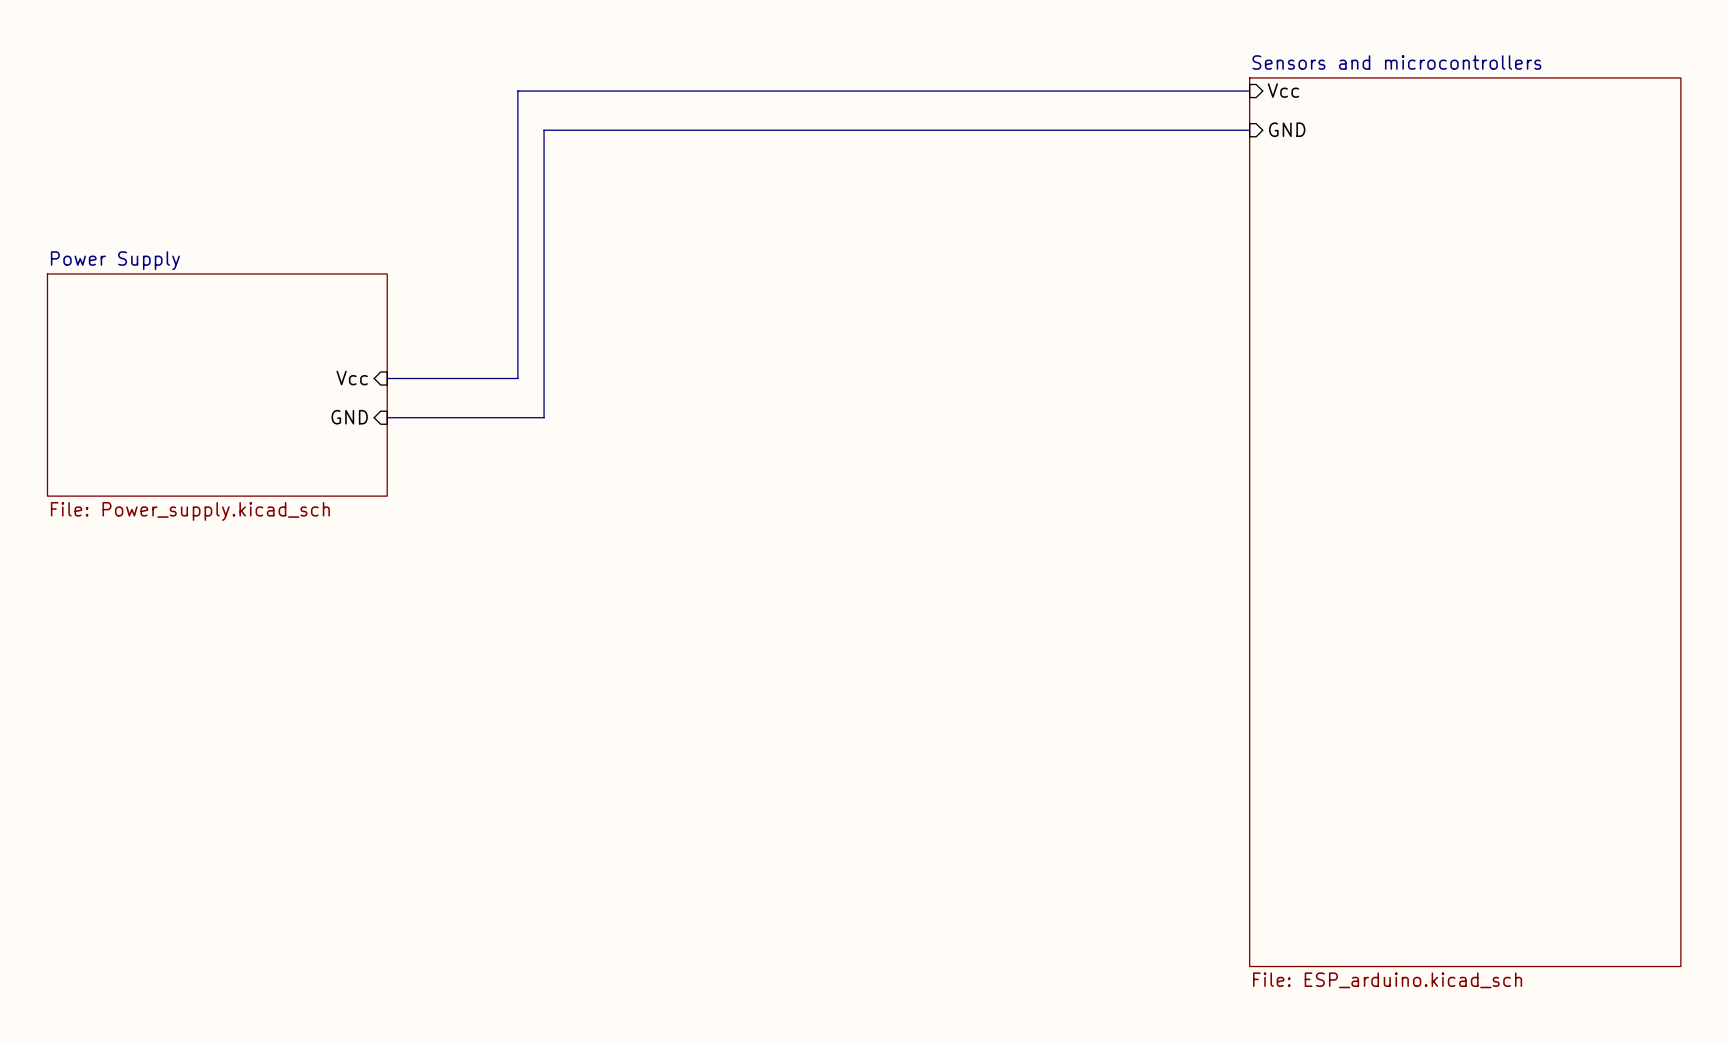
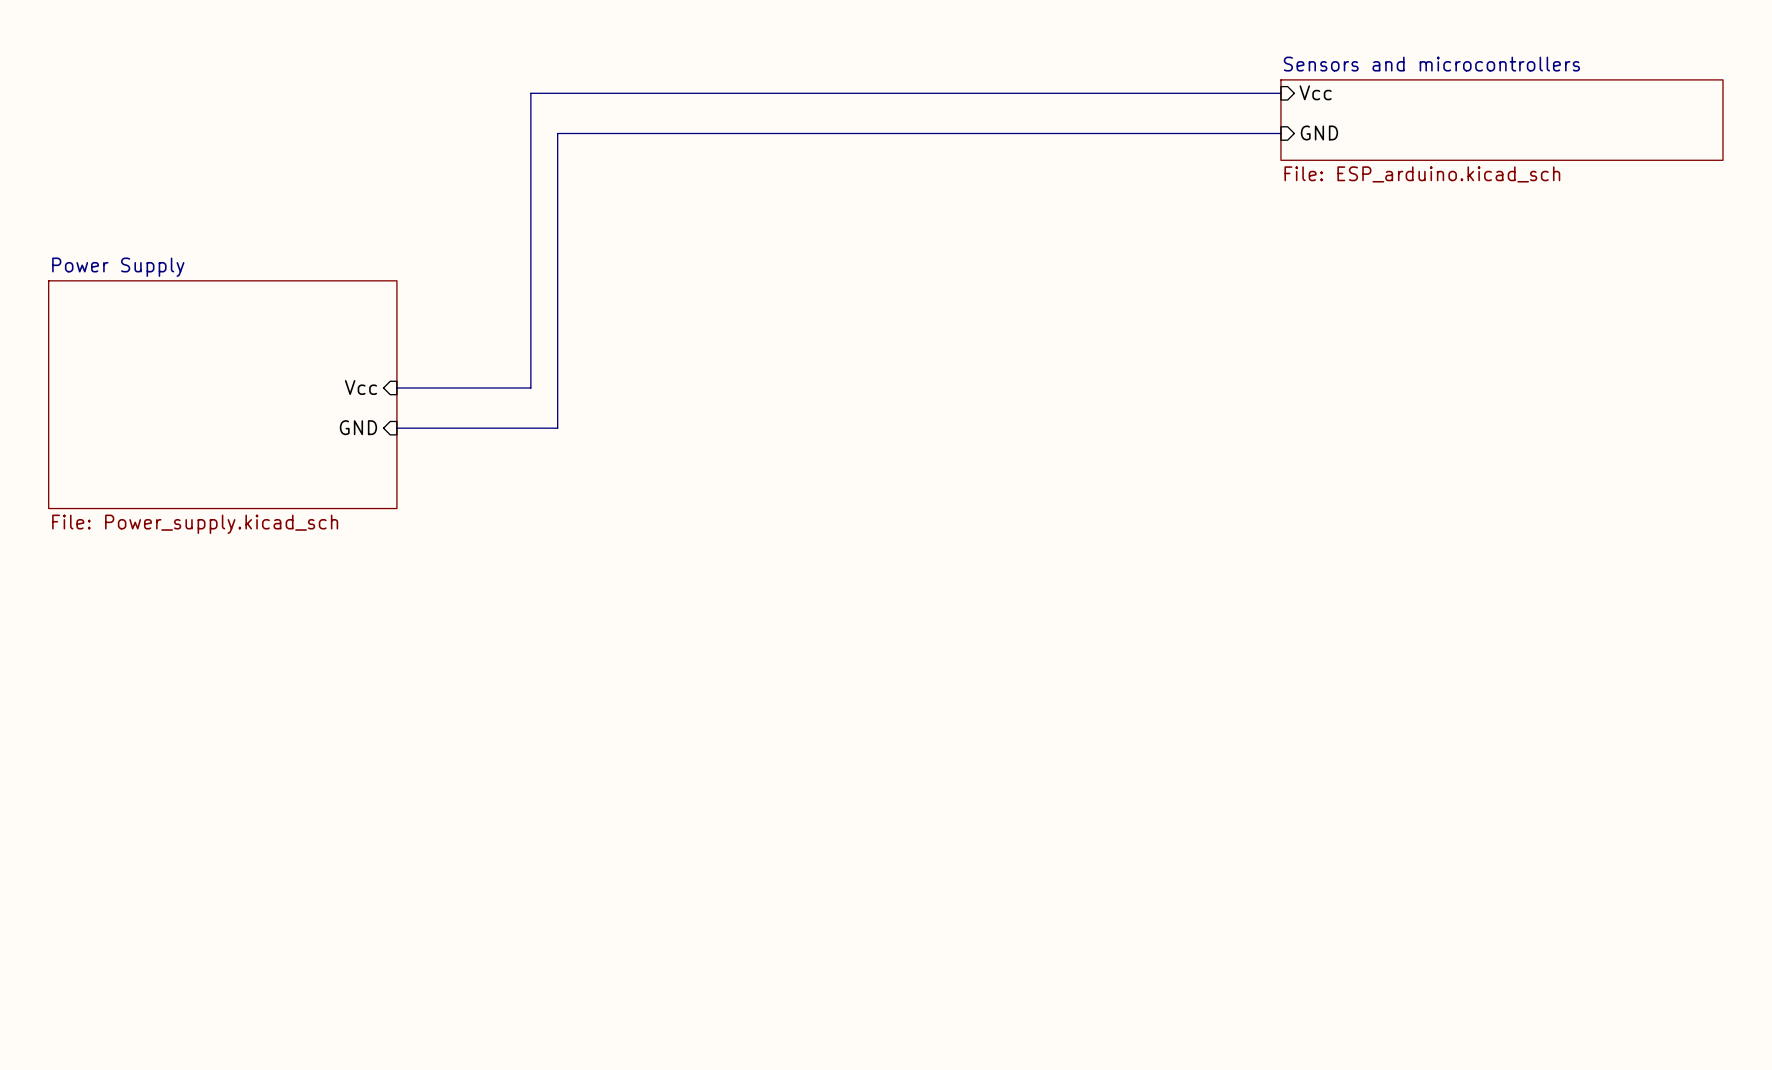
sheet Sensors and microcontrollers: none -> File: ESP_arduino.kicad_sch (1501, 120)
sheet Sensors and microcontrollers: File: ESP_arduino.kicad_sch (1465, 522) -> none

